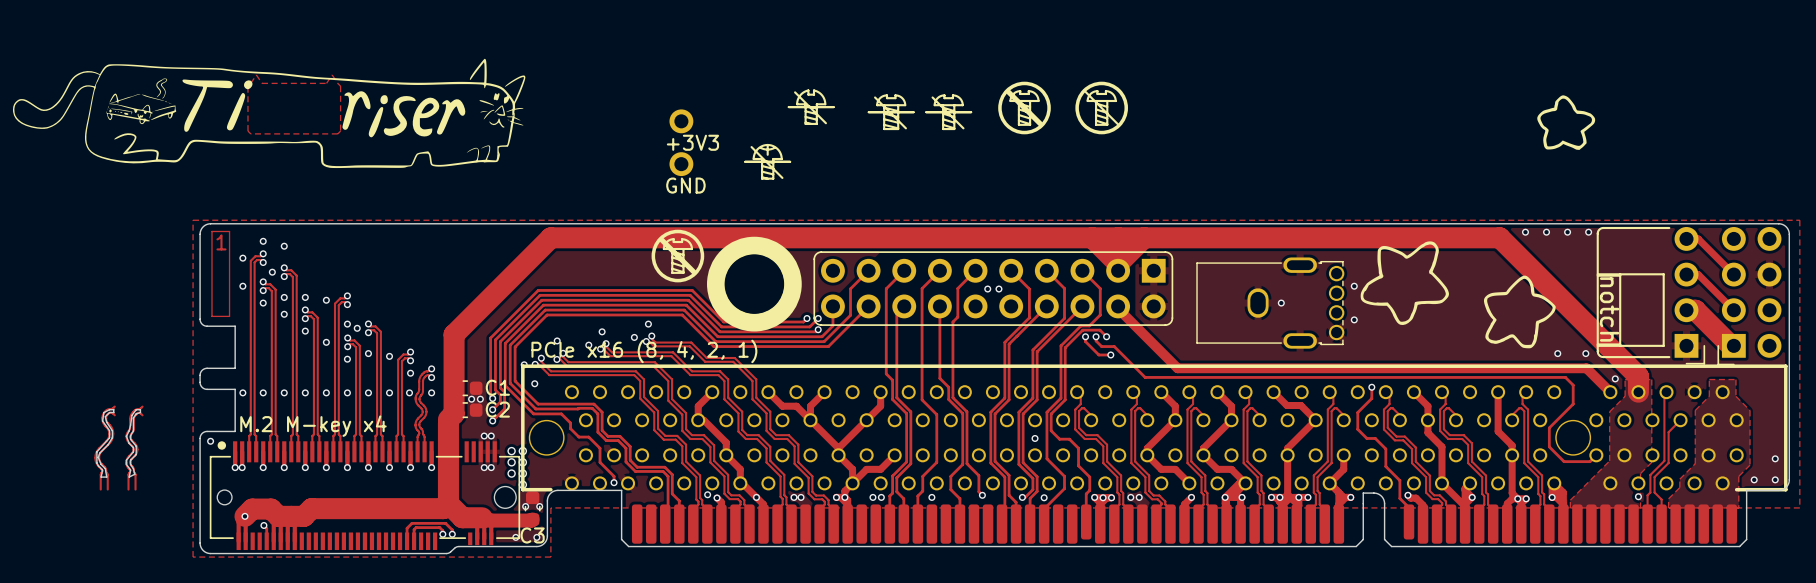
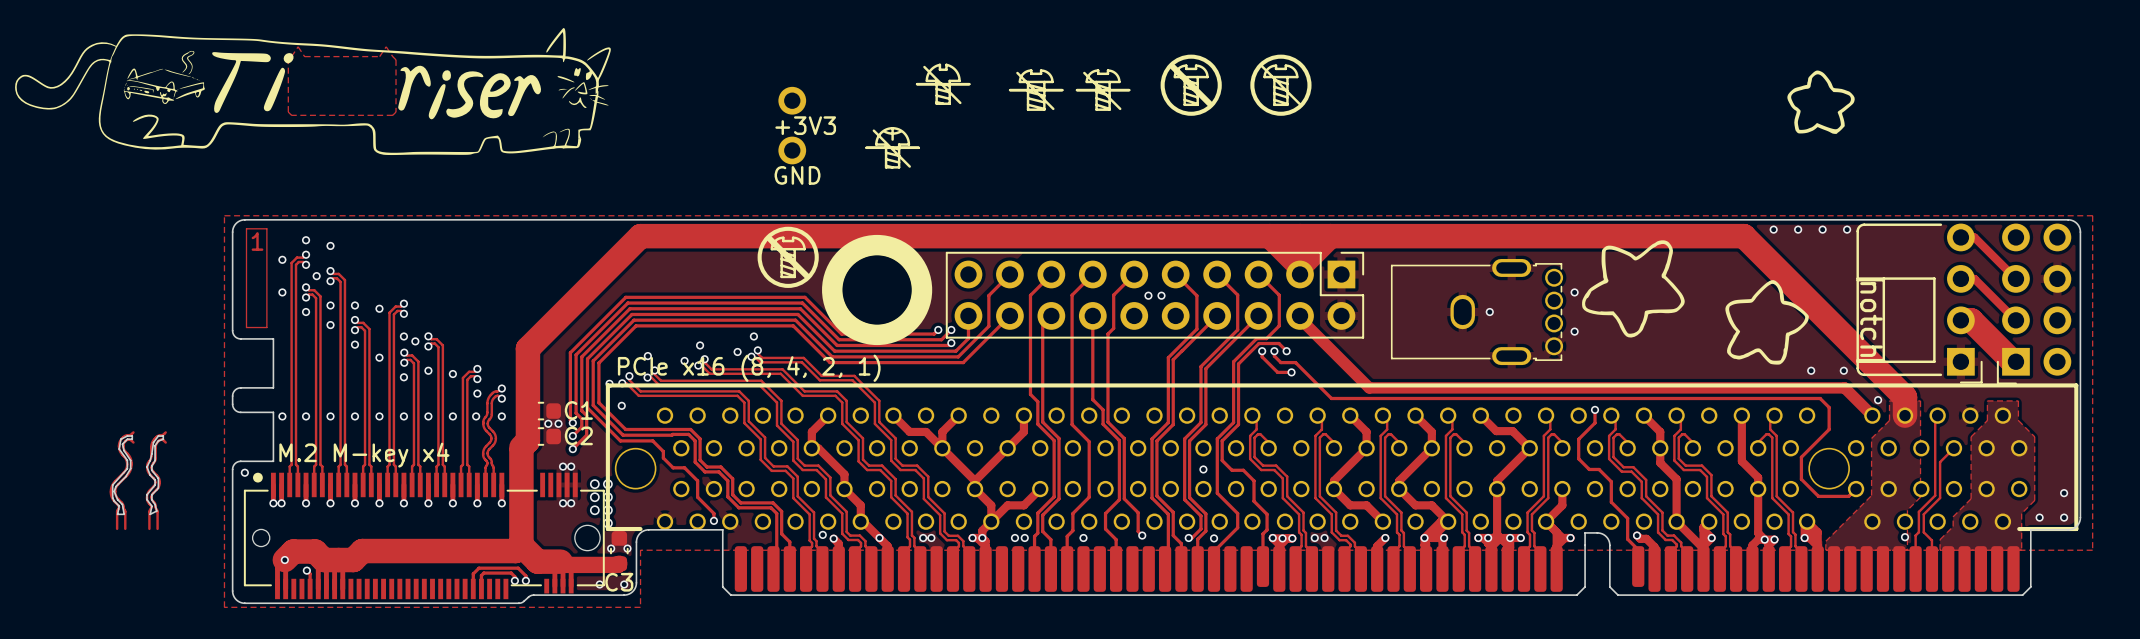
part footprint: [813, 251, 1174, 326] -> [945, 251, 1365, 339]

